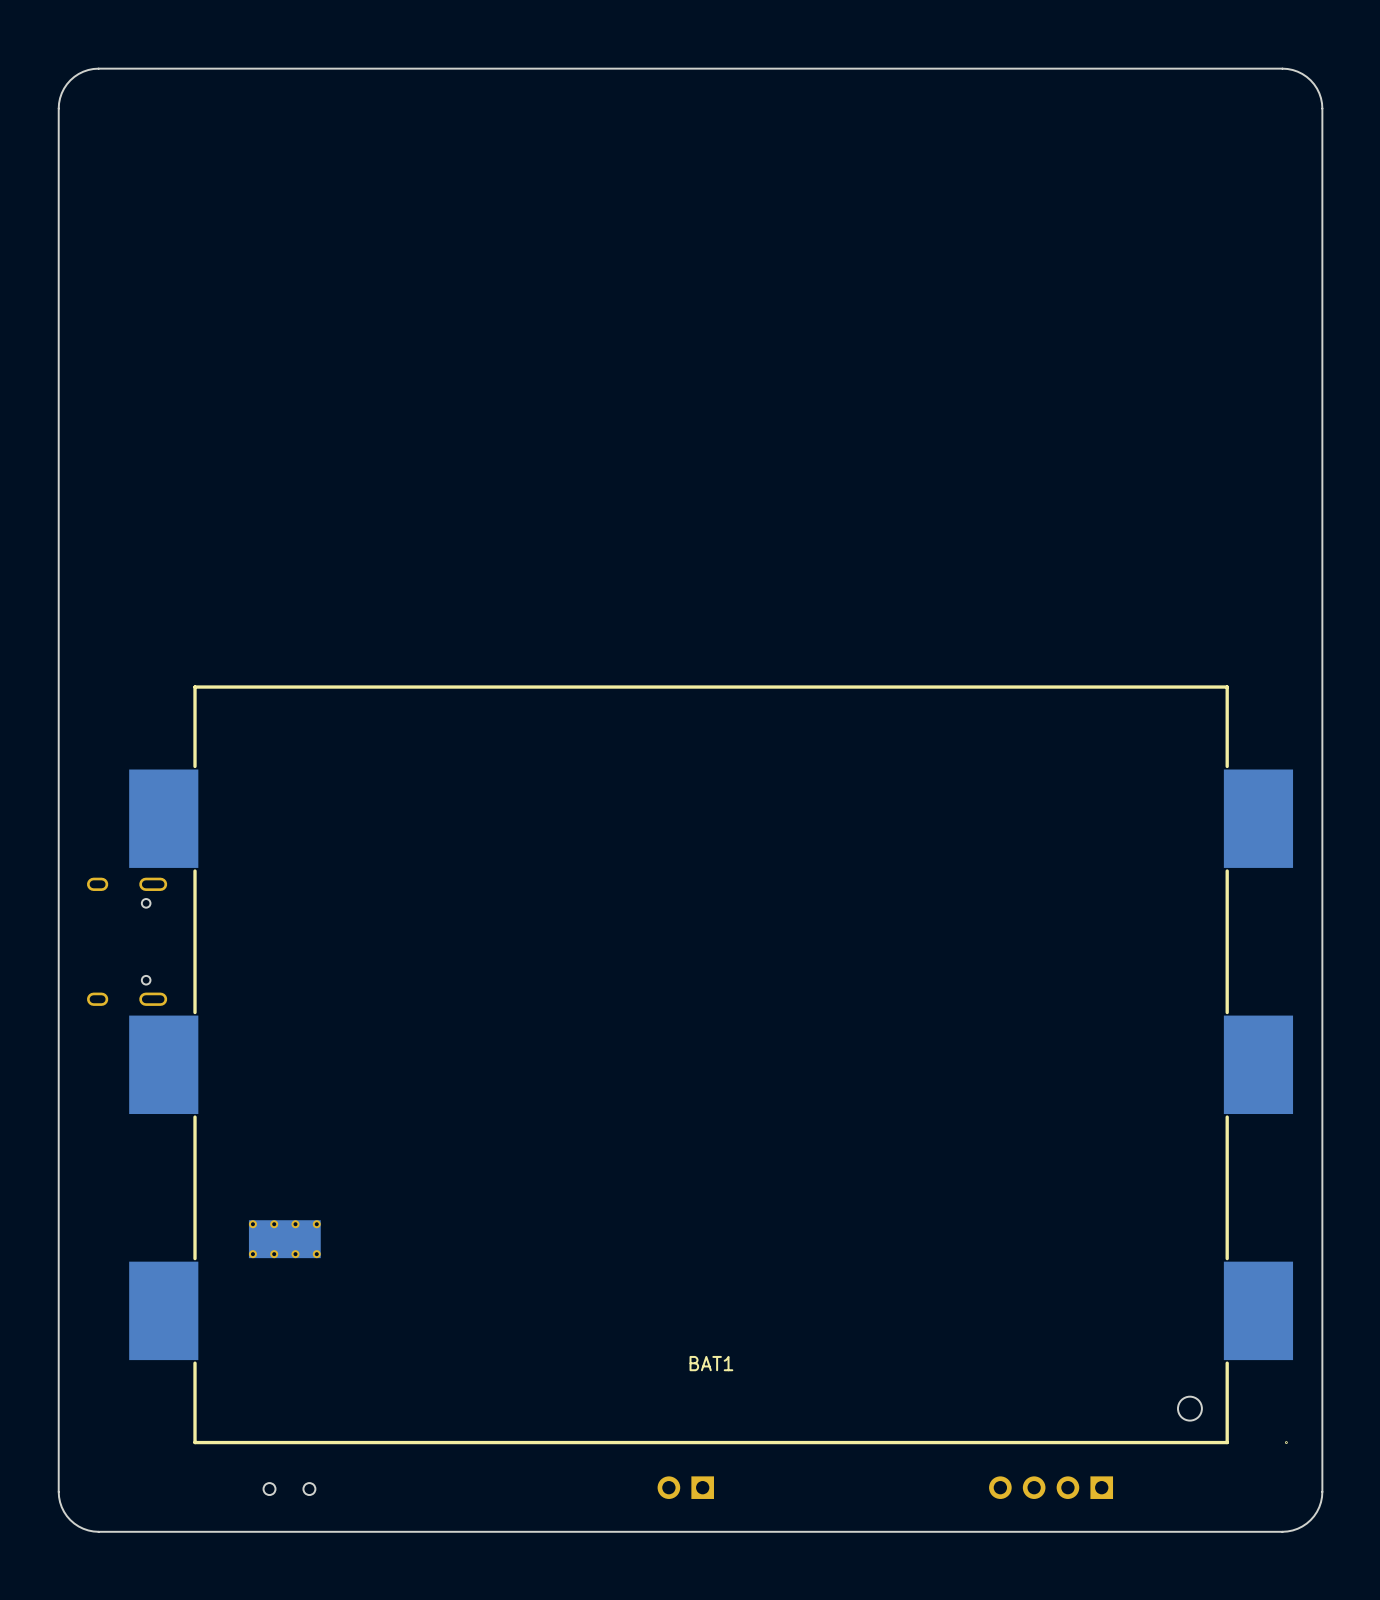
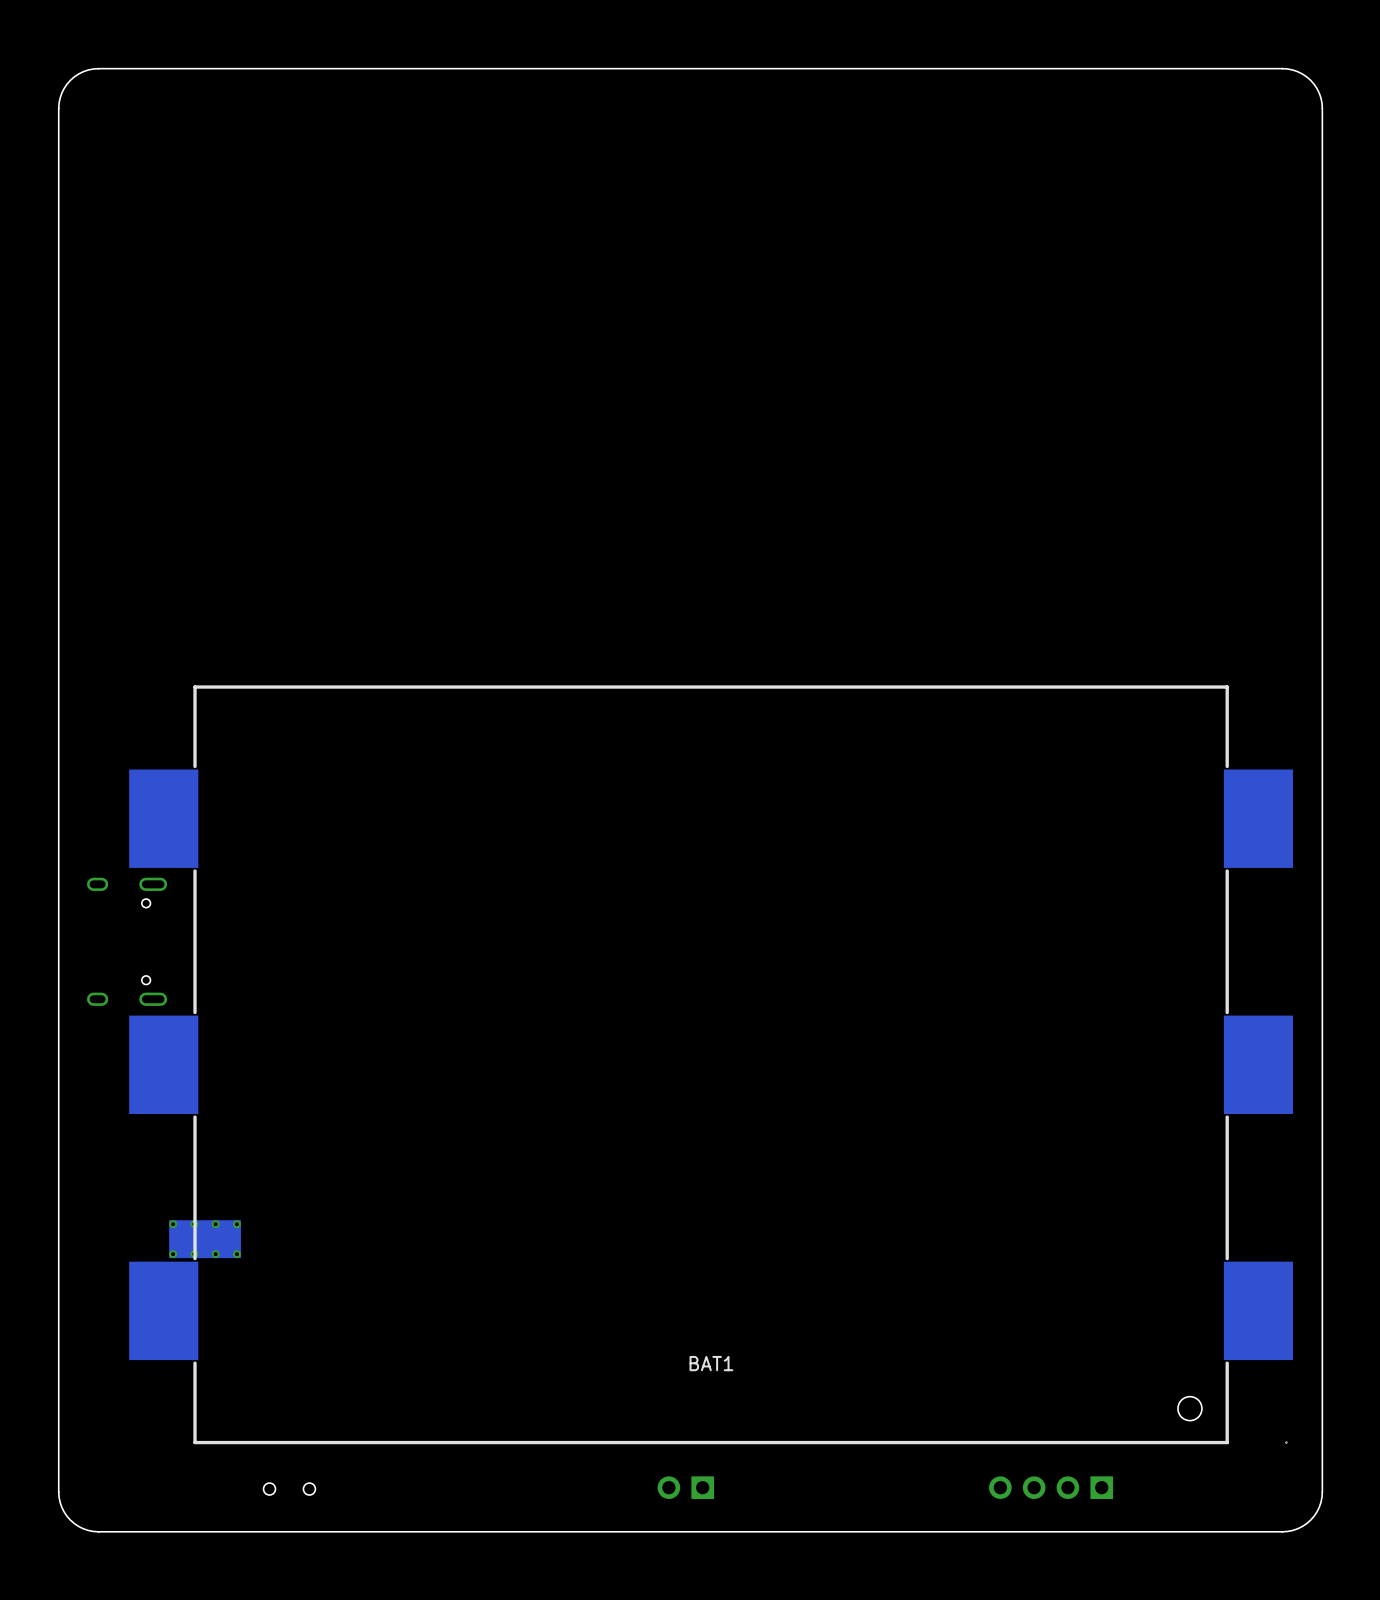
part position: (284, 1239) -> (205, 1239)

